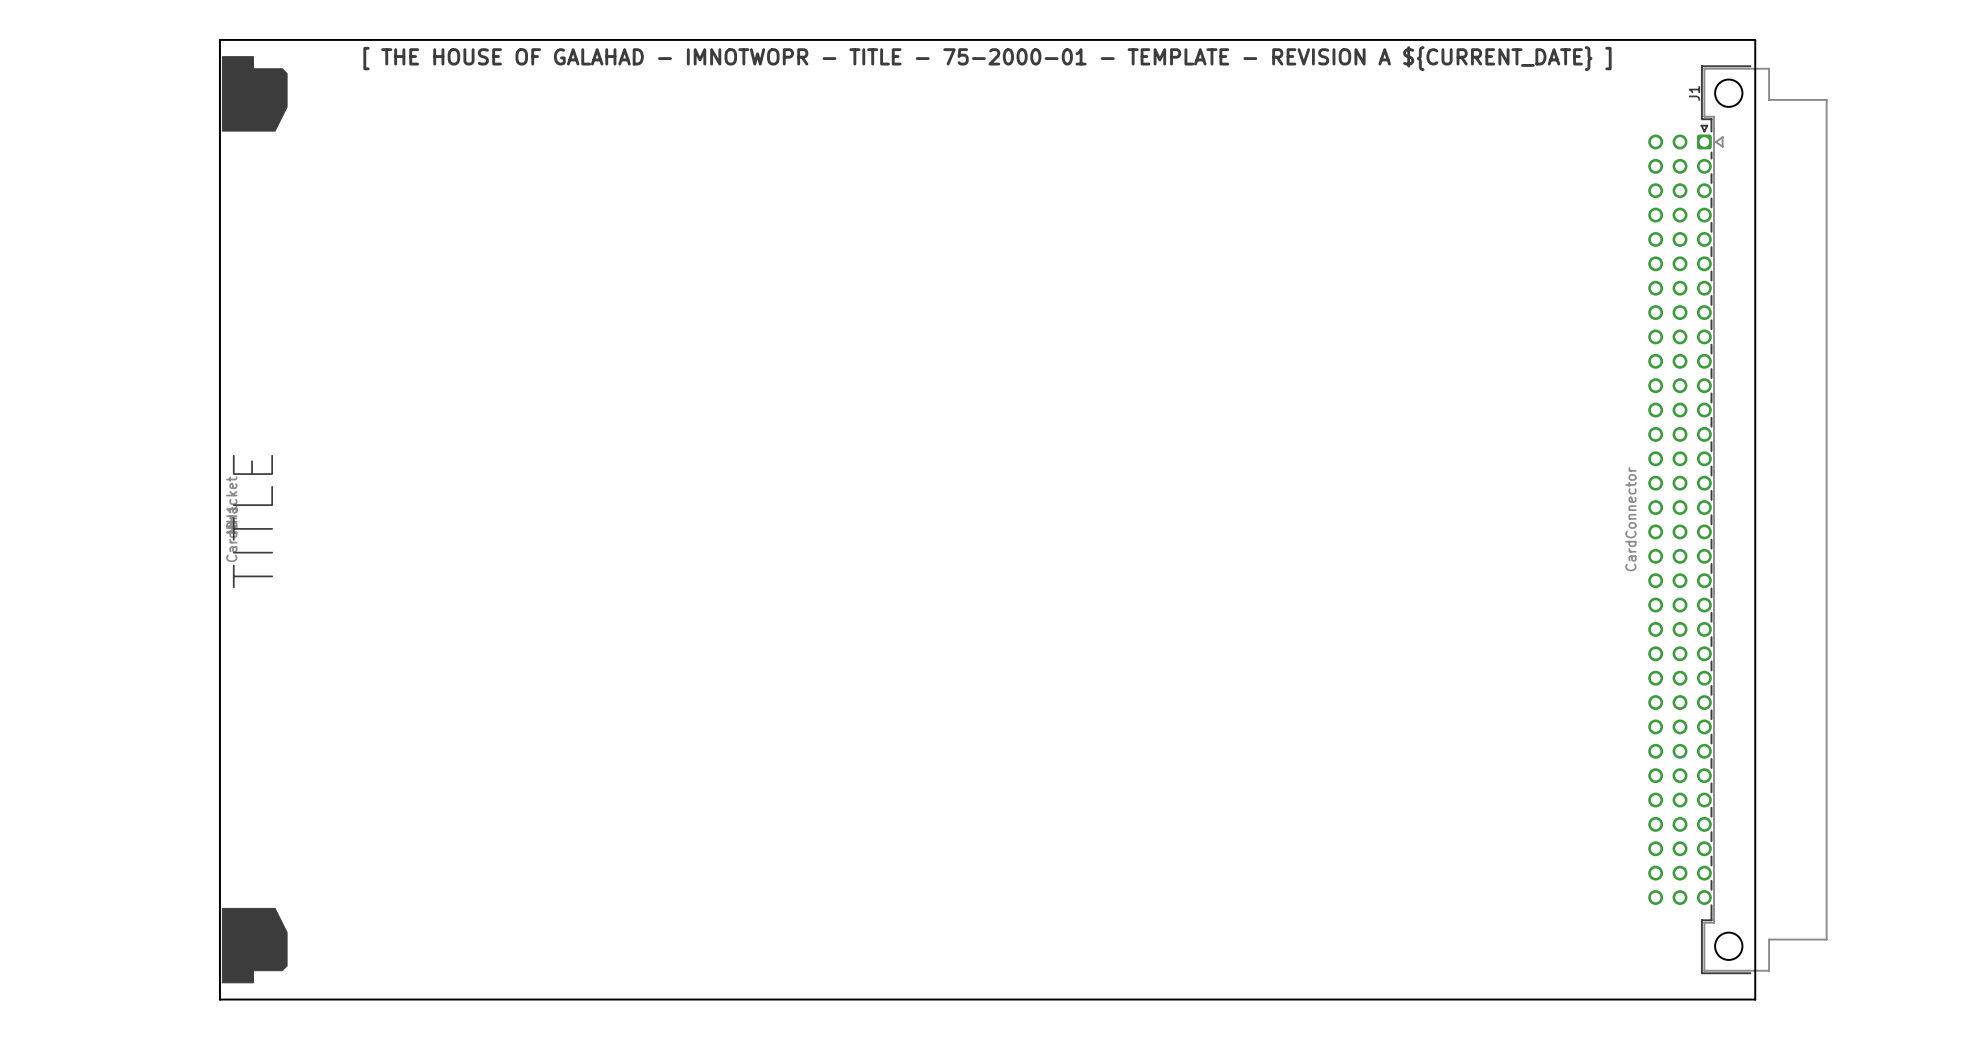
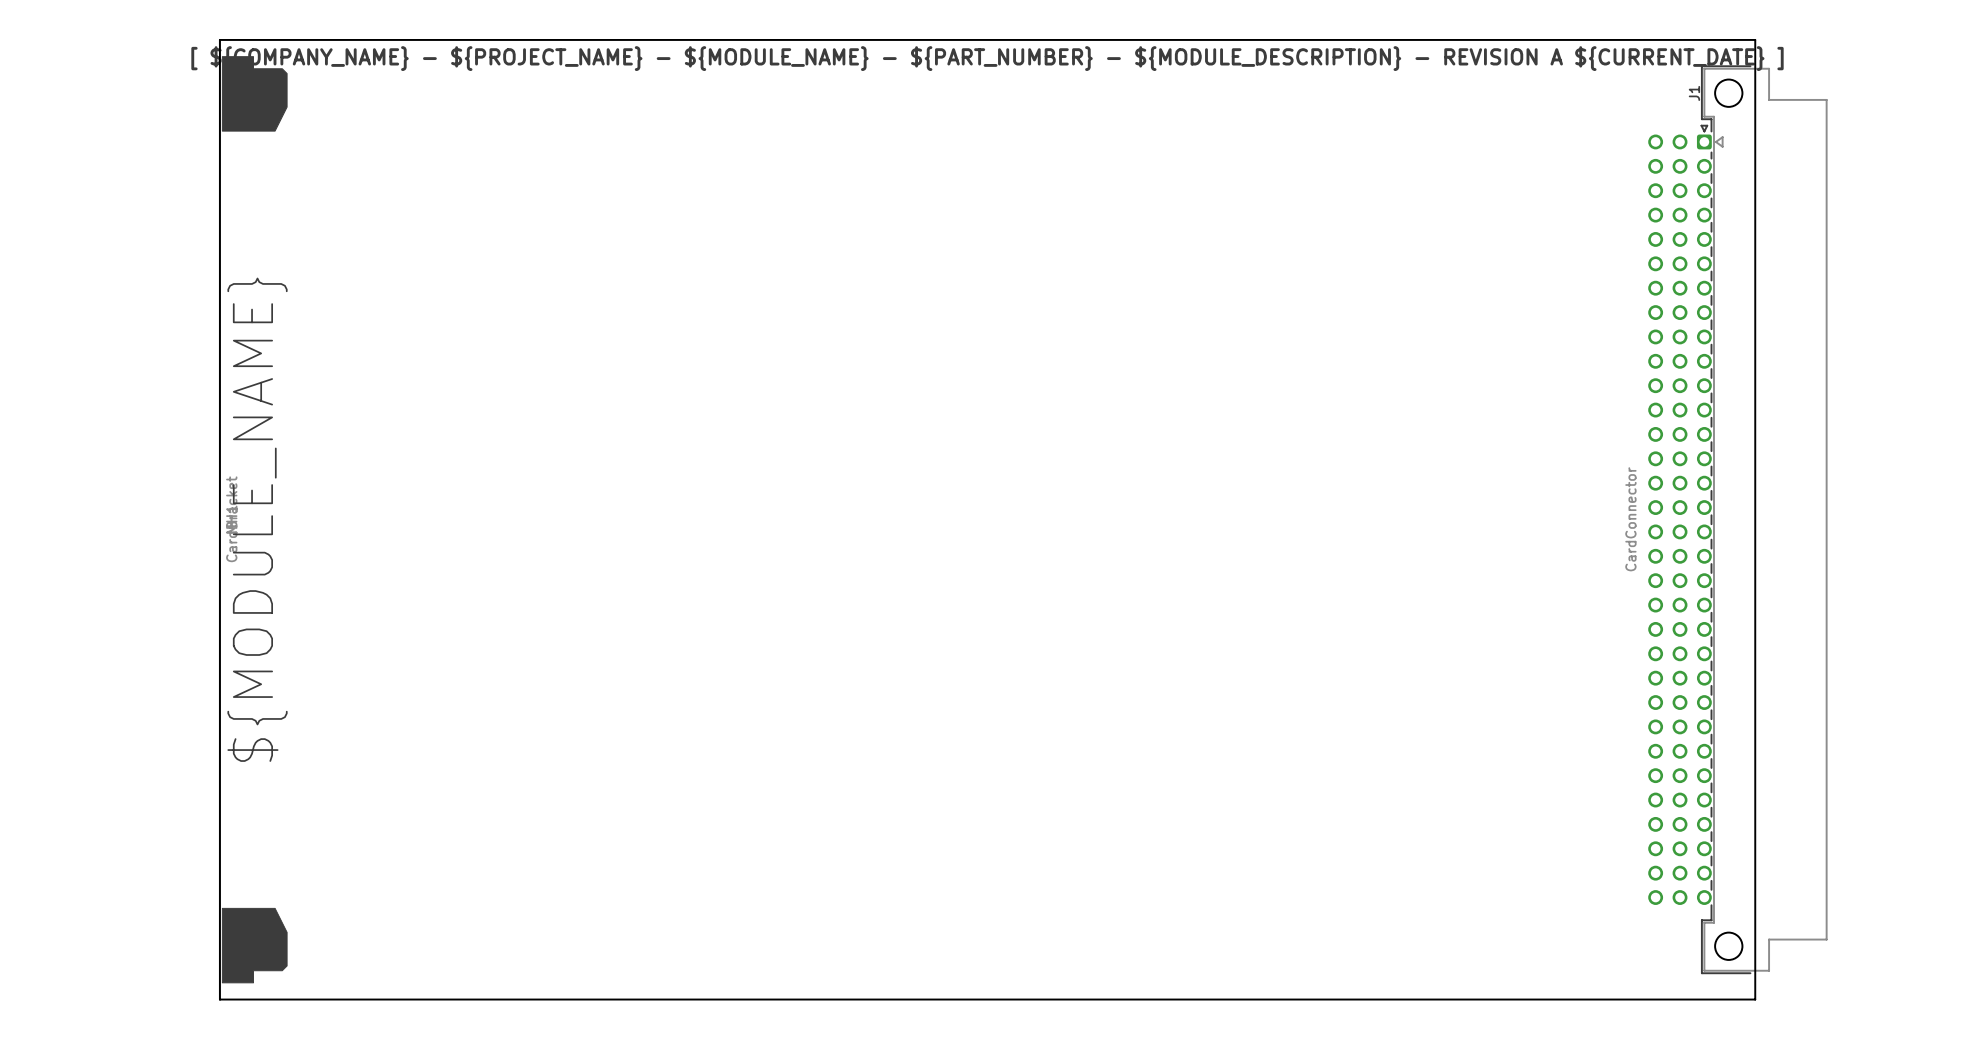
text: [ THE HOUSE OF GALAHAD - IMNOTWOPR - TITLE - 75-2000-01 - TEMPLATE - REVISION A ${CURRENT_DATE} ] (987, 58) -> [ ${COMPANY_NAME} - ${PROJECT_NAME} - ${MODULE_NAME} - ${PART_NUMBER} - ${MODULE_DESCRIPTION} - REVISION A ${CURRENT_DATE} ] (987, 58)
text: TITLE (252, 521) -> ${MODULE_NAME} (257, 519)

